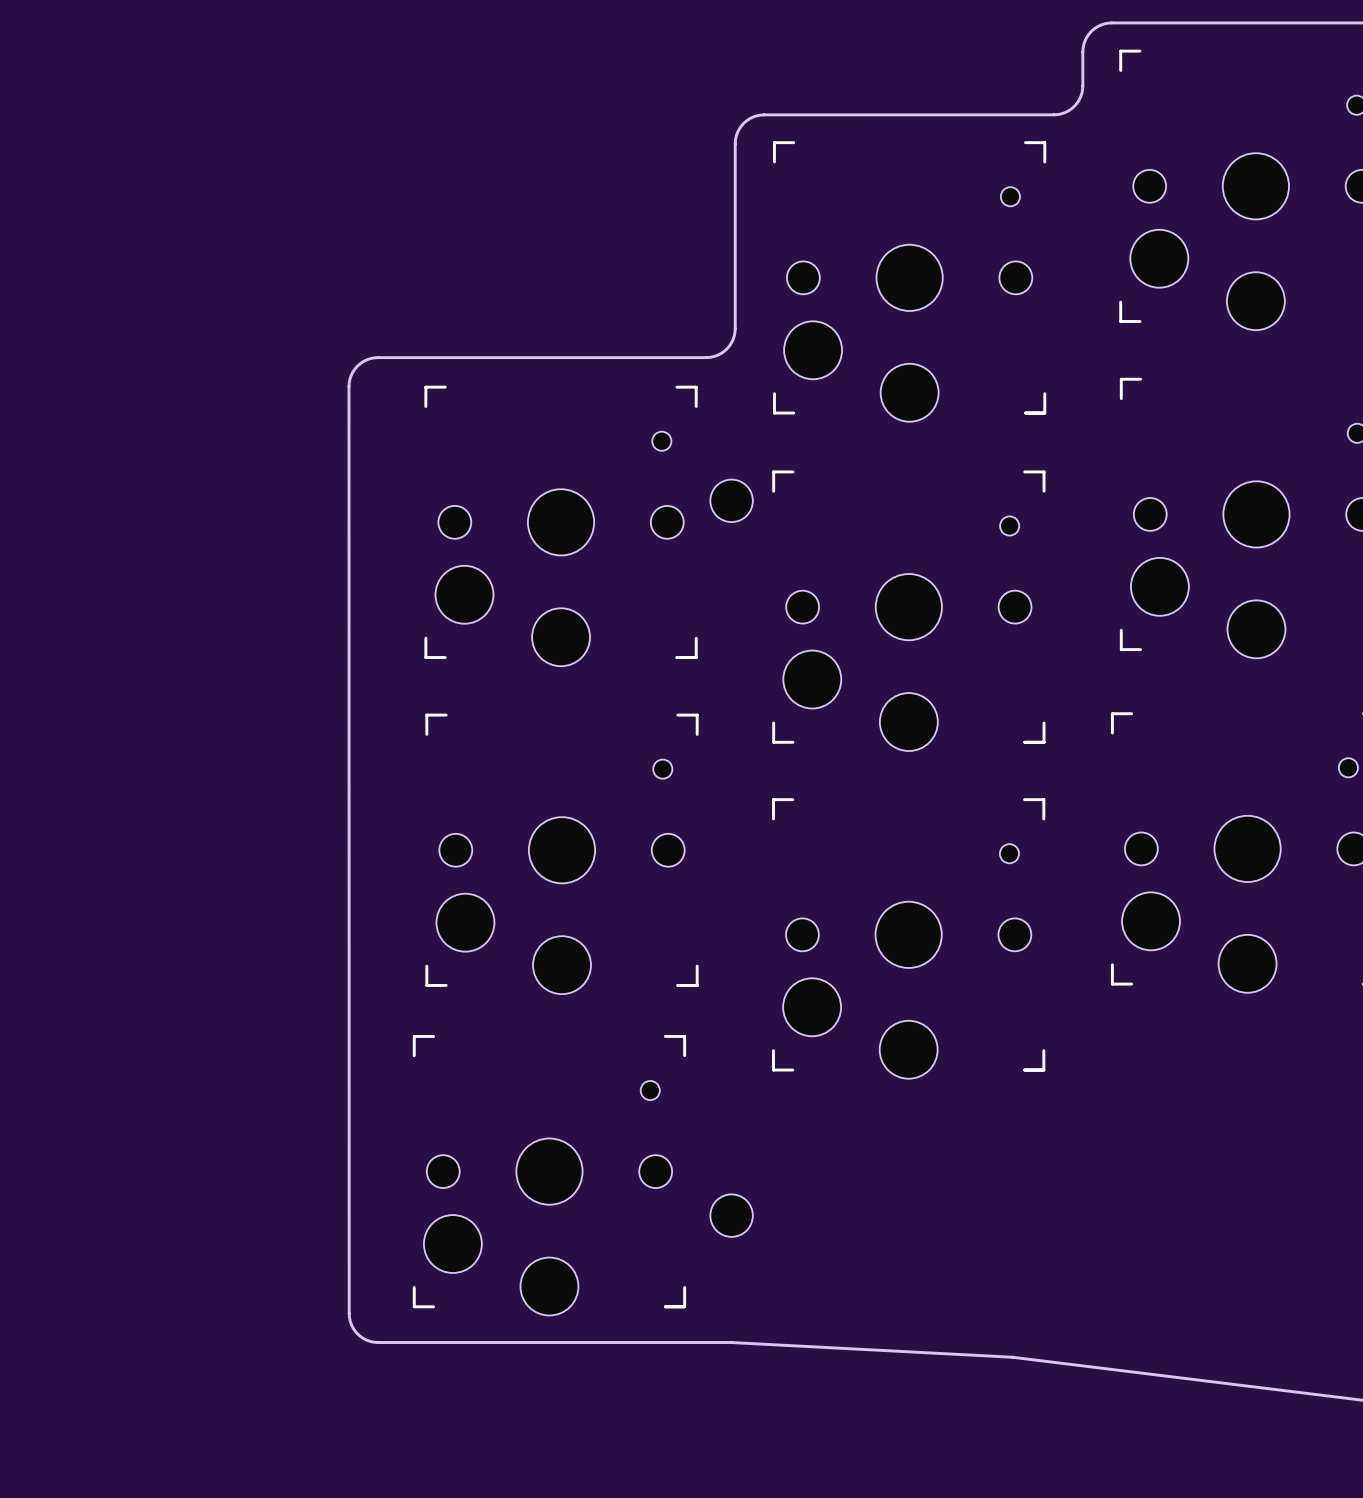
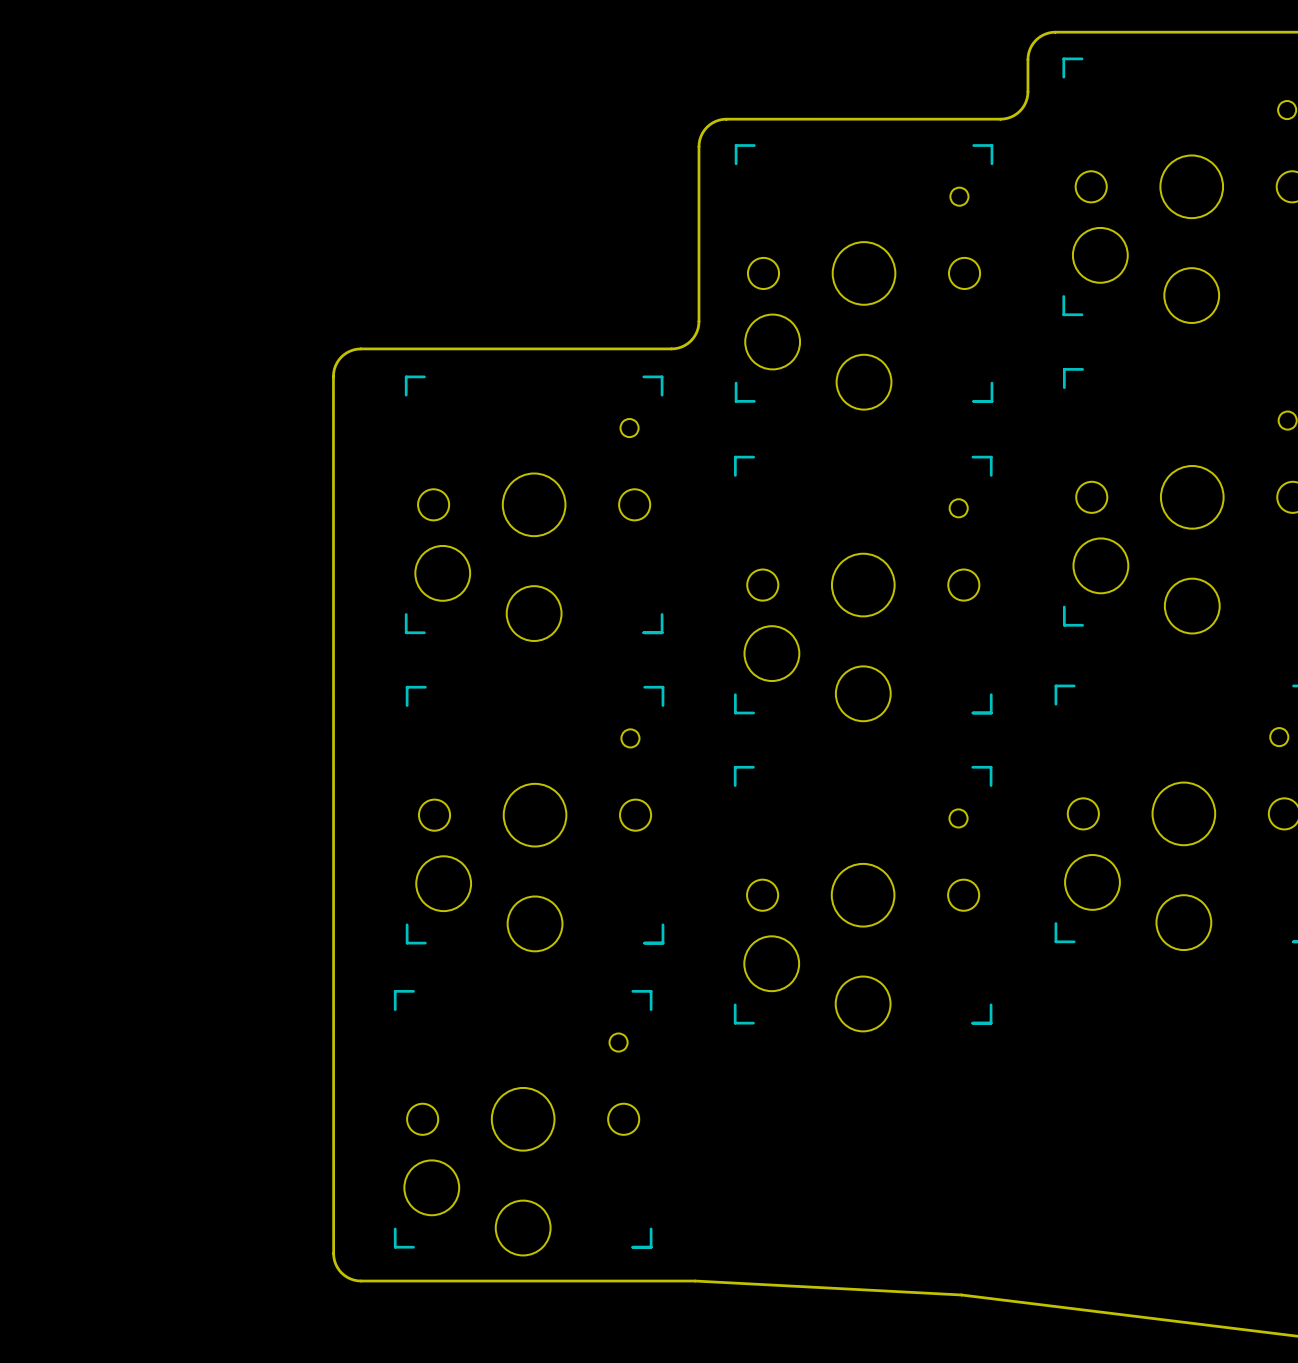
part: (731, 500) -> none
part: (731, 1215) -> none

